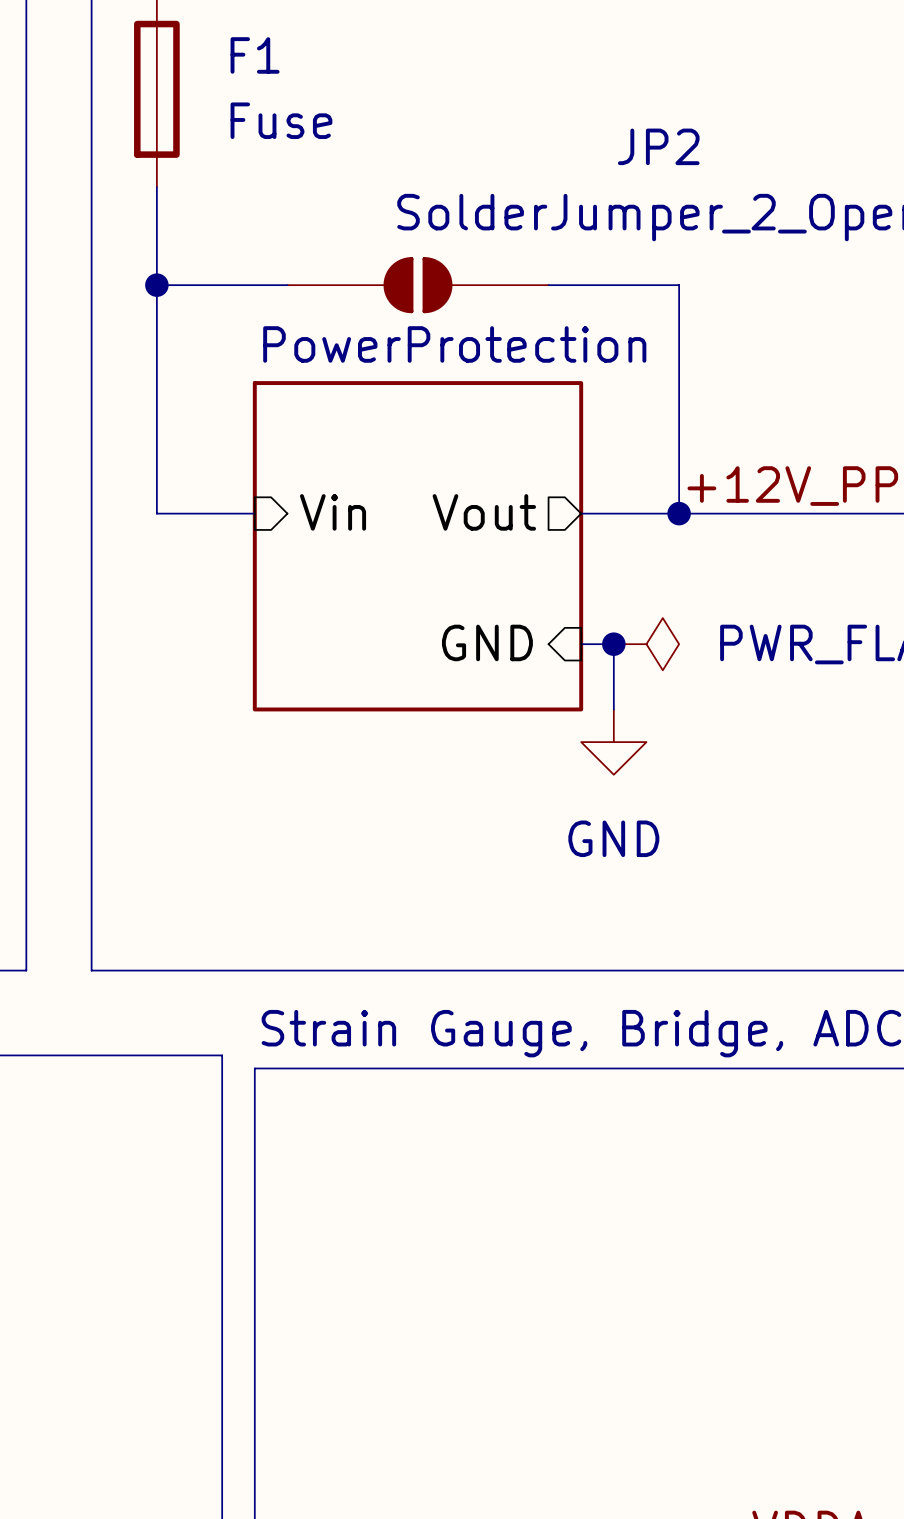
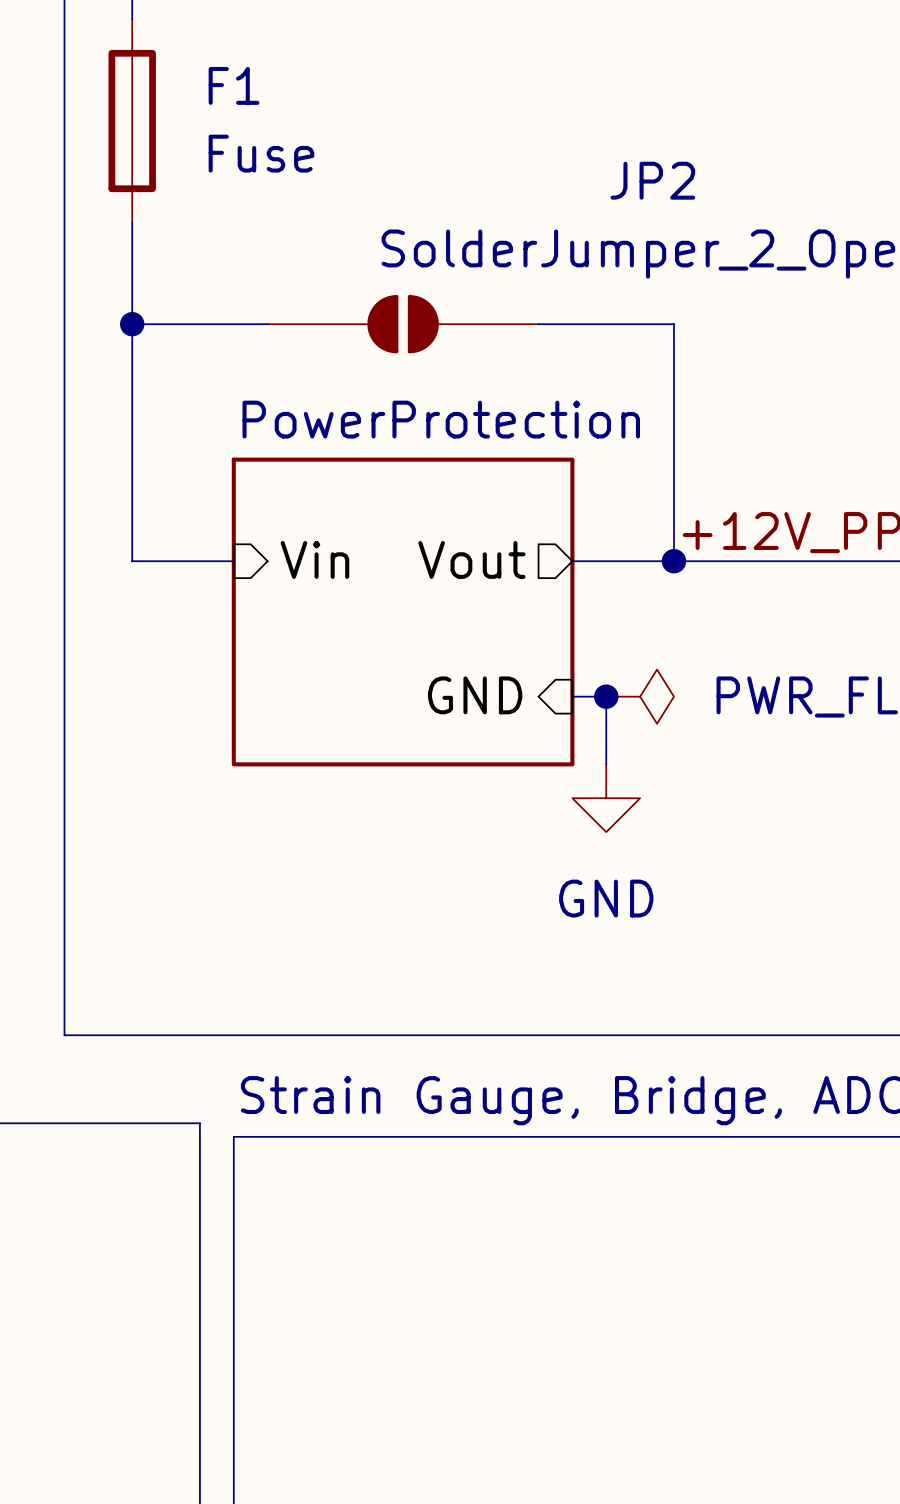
sheet PowerProtection shape: [252, 381, 584, 712] -> [231, 457, 575, 767]

